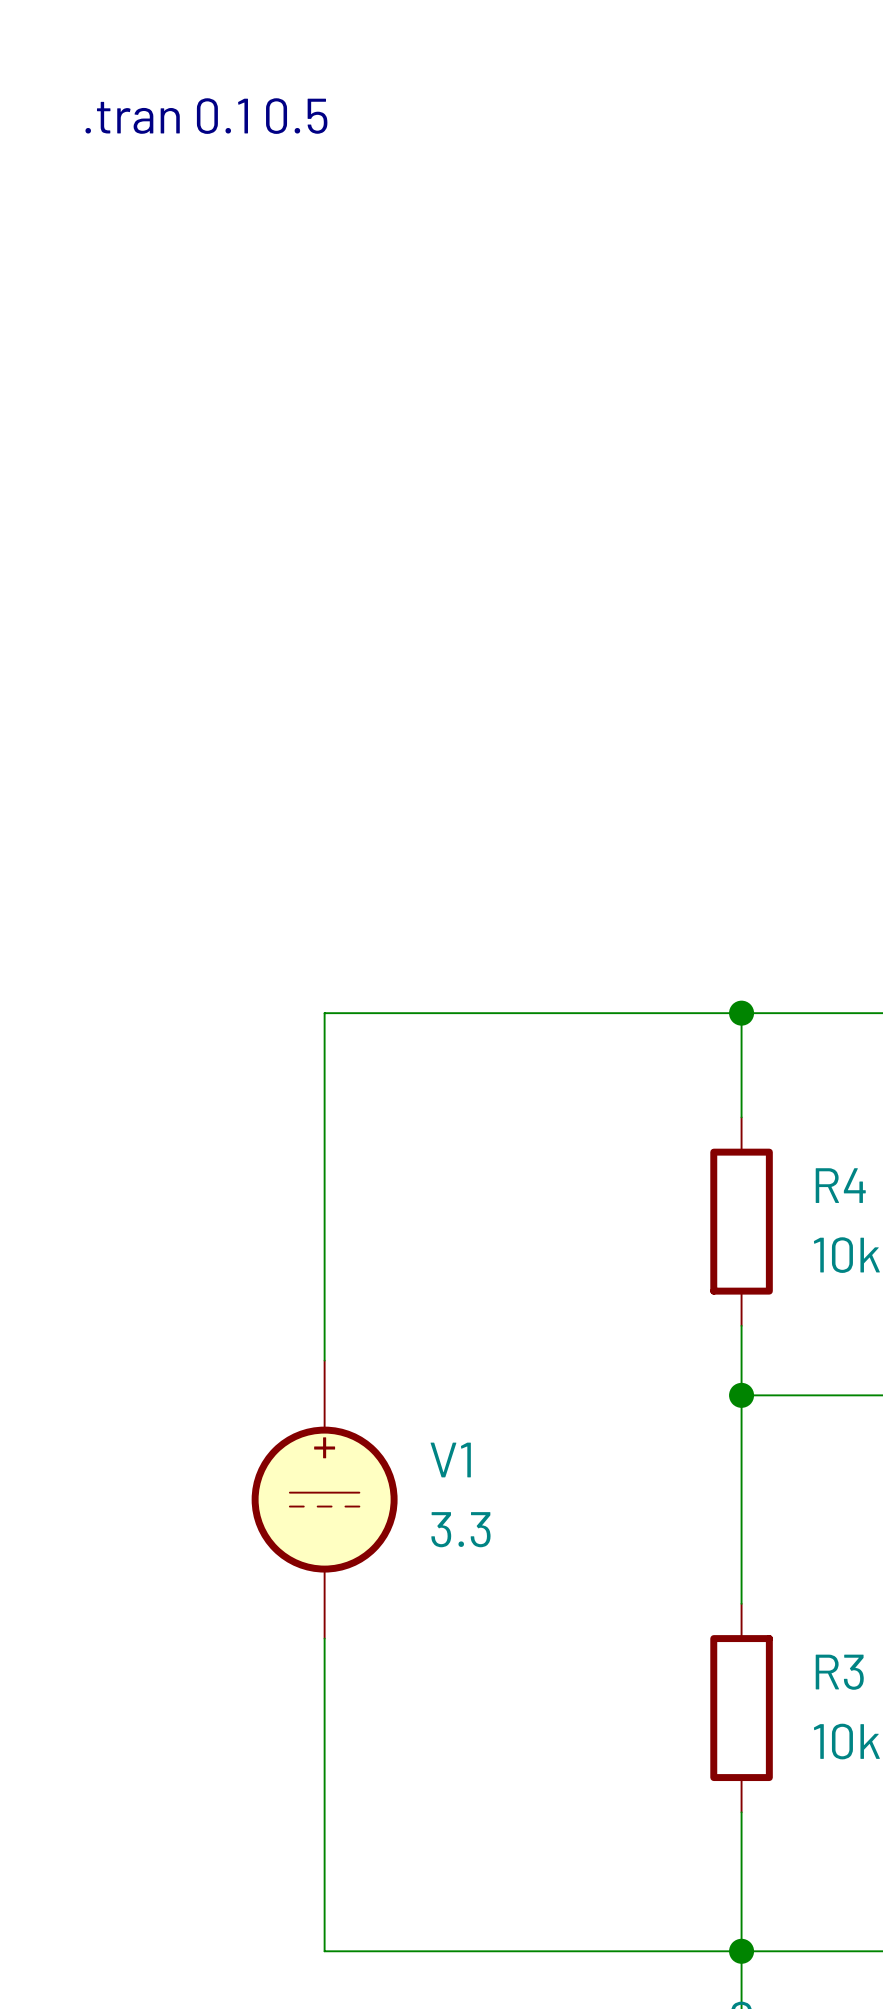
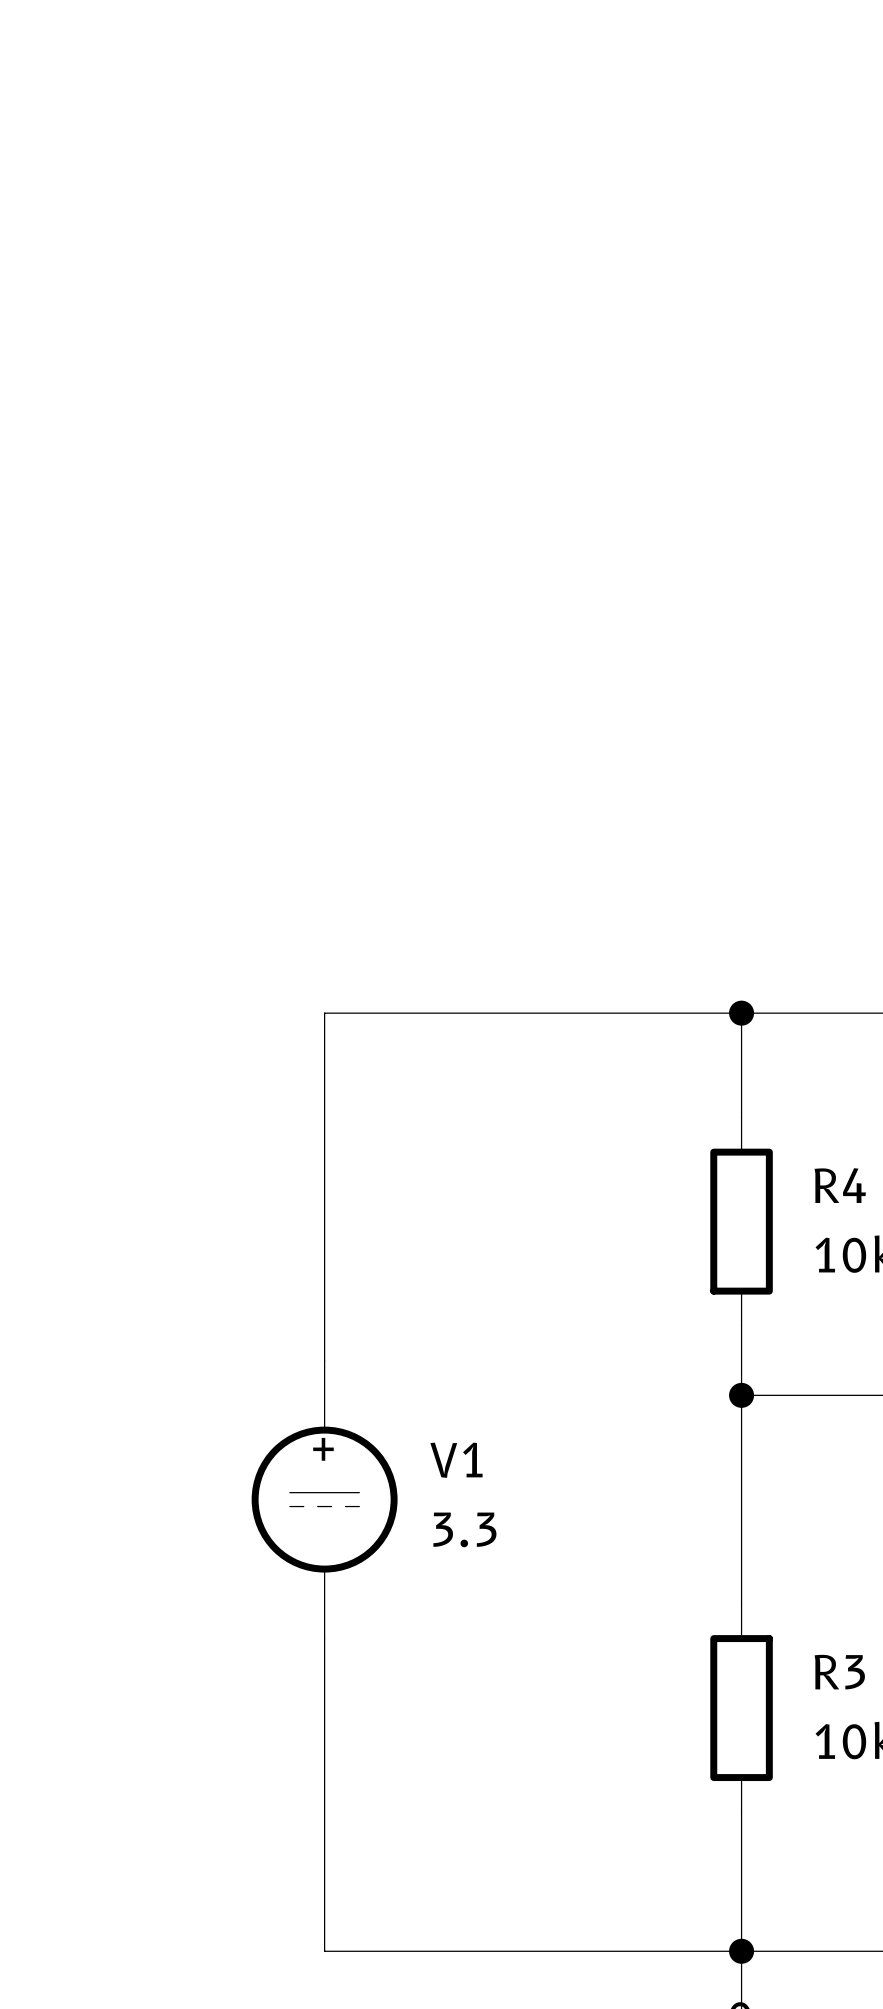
text: .tran 0.1 0.5 (206, 116) -> none

